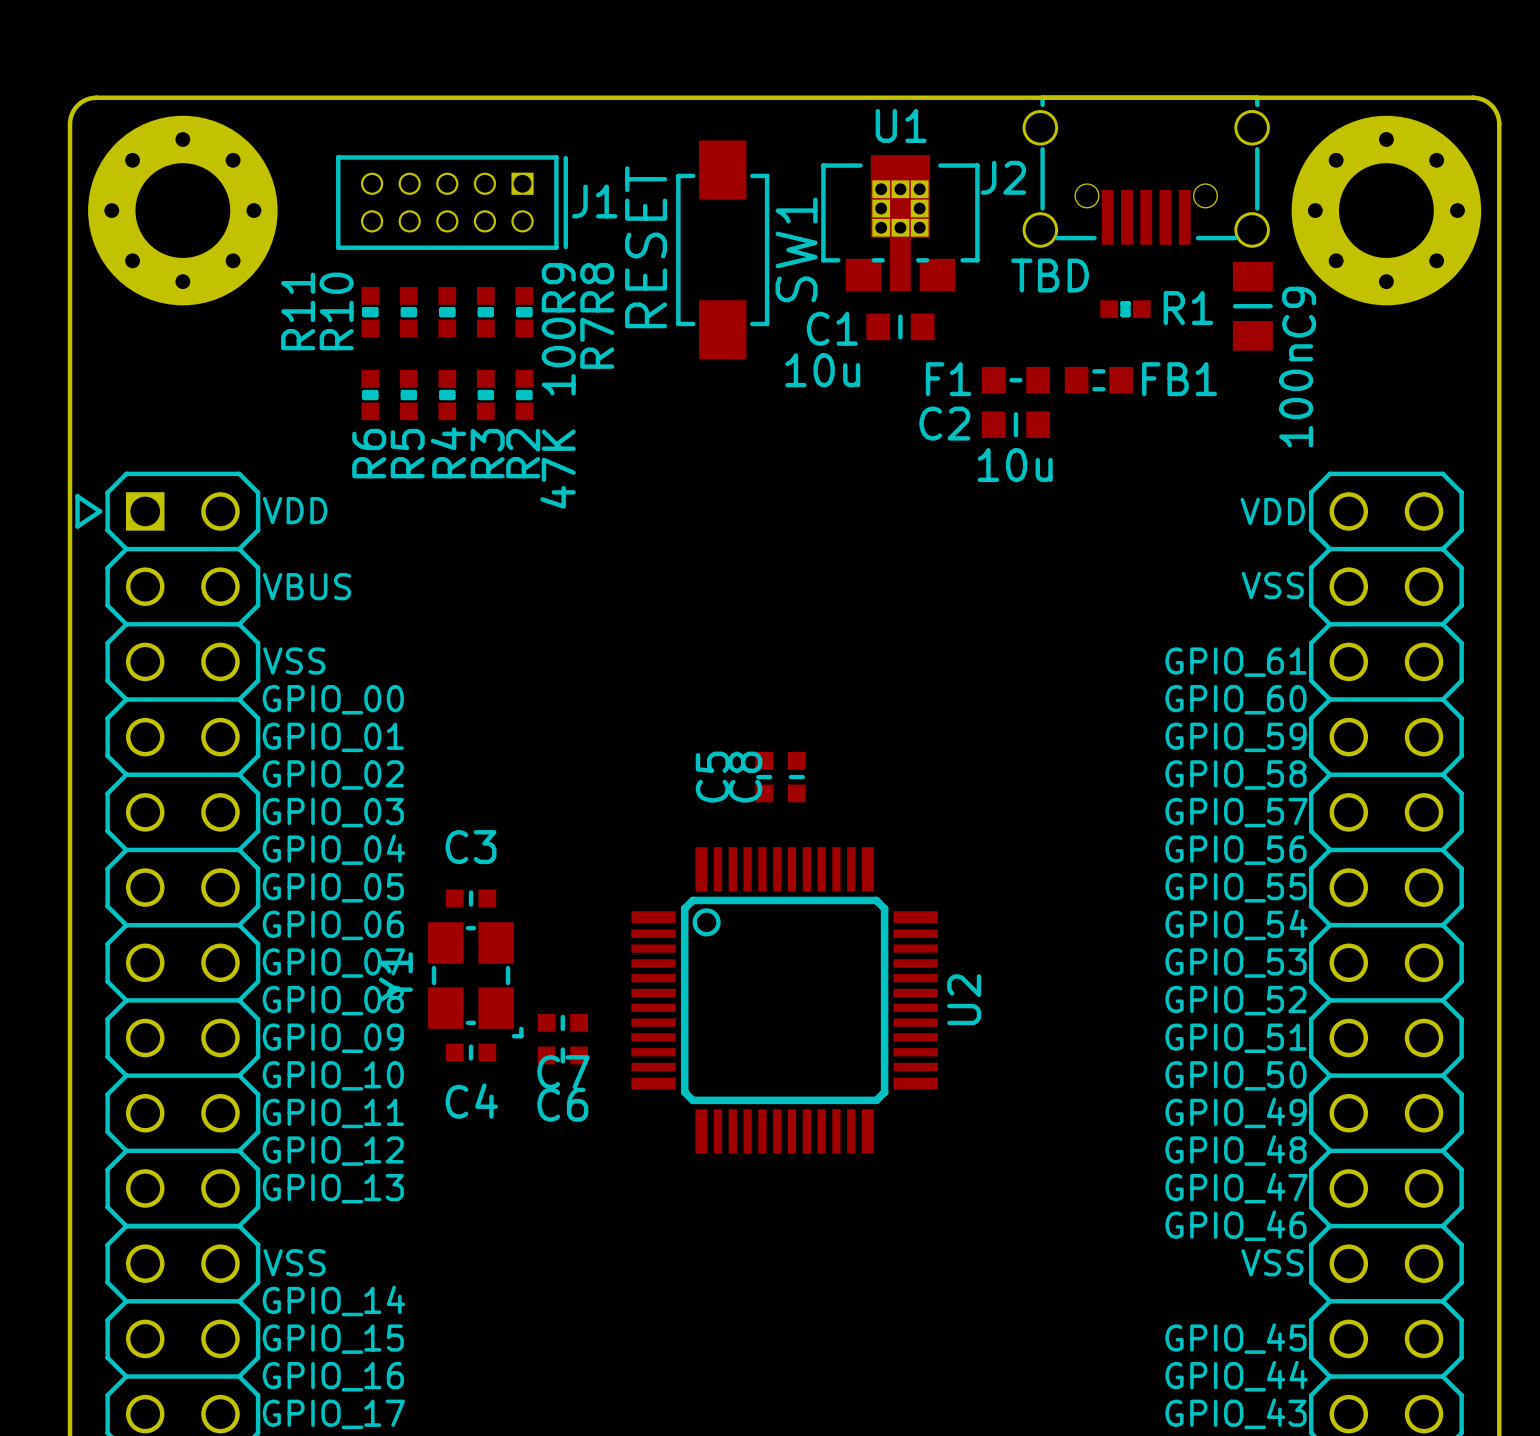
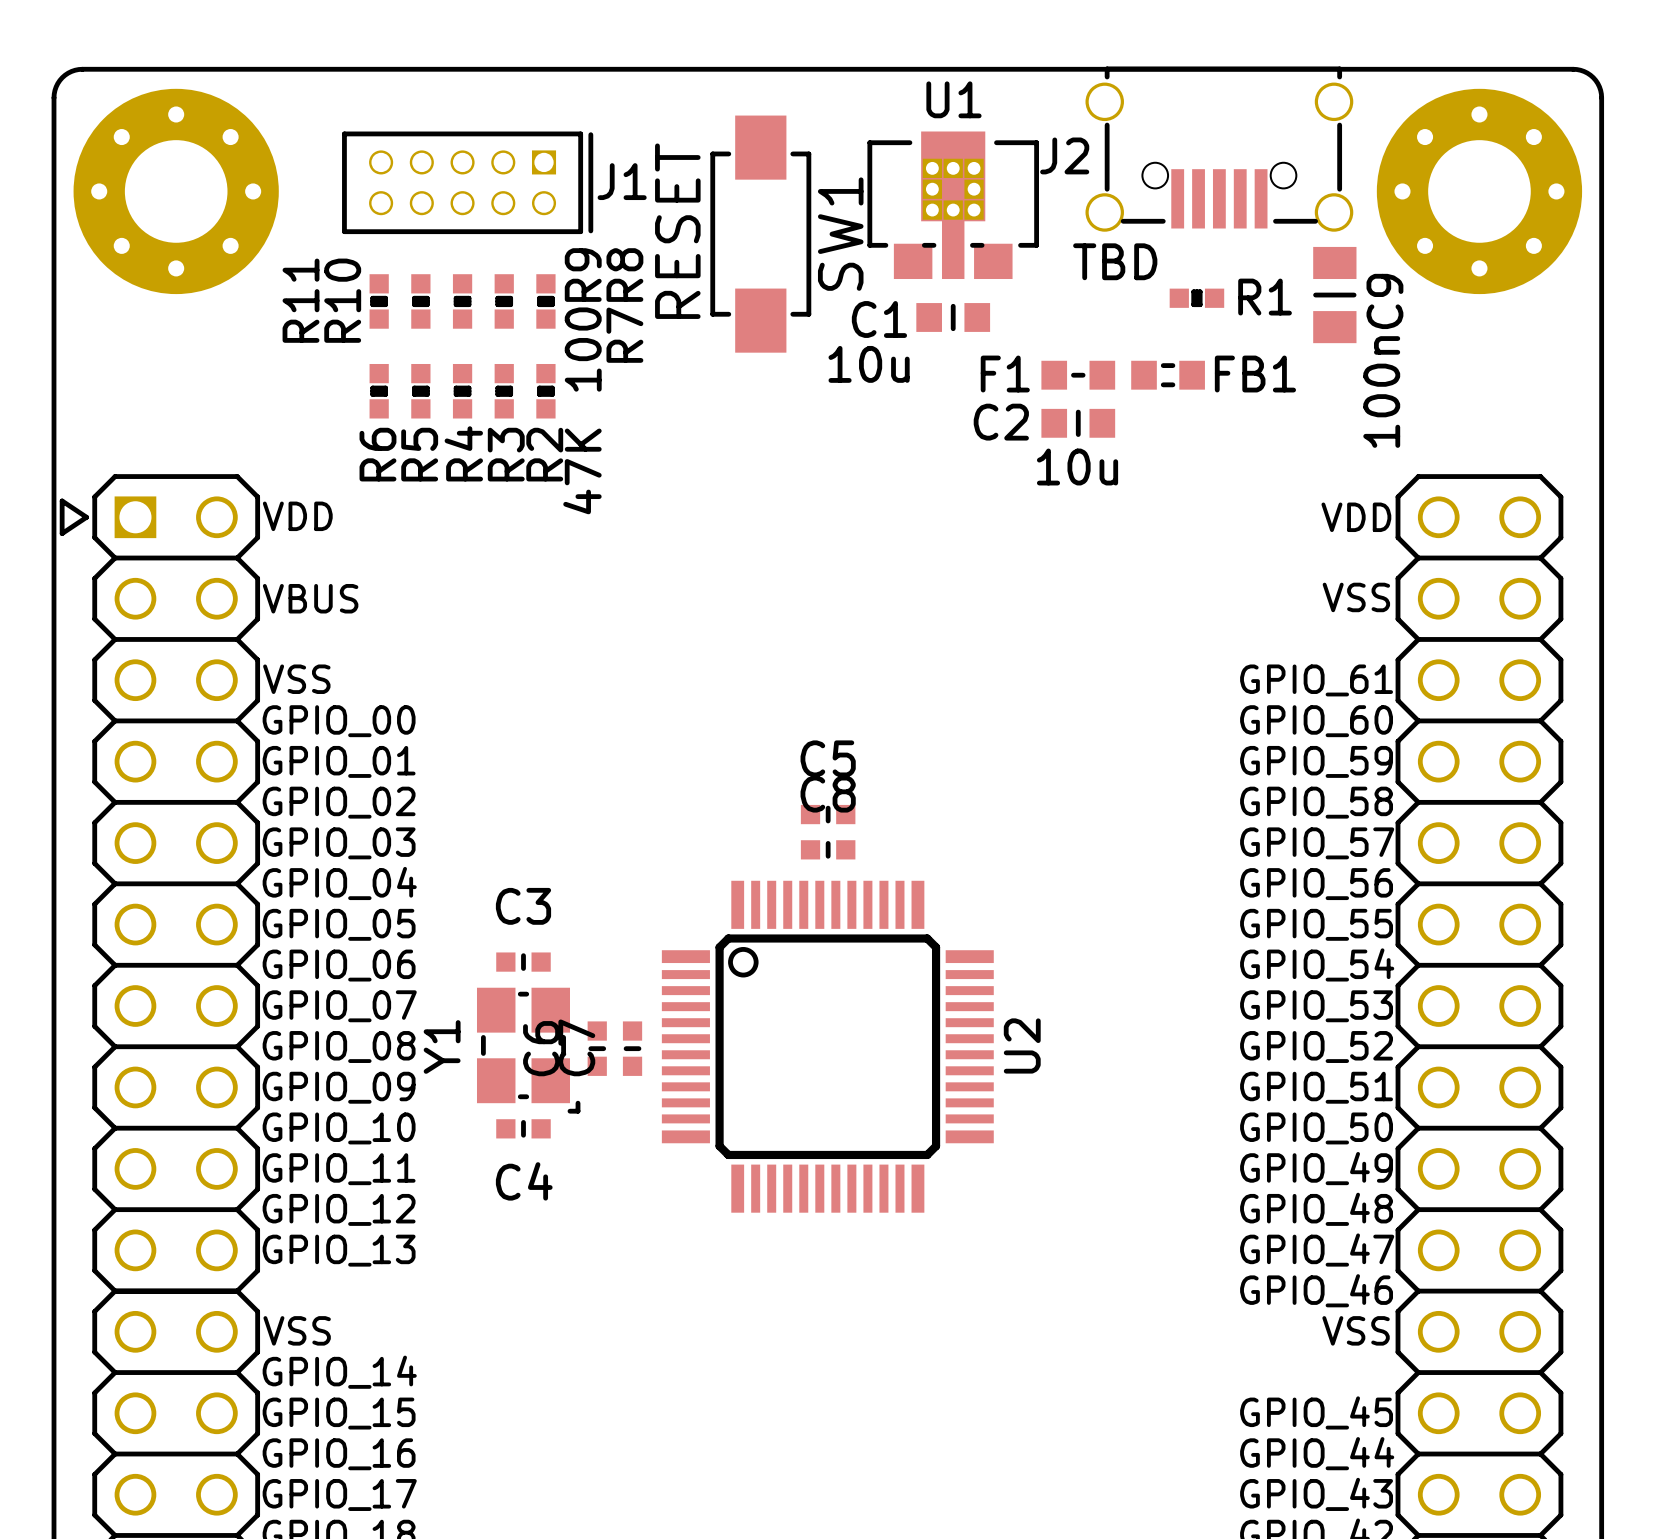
C5 rotation: 0° (764, 777) -> 90° clockwise (828, 814)
C8 rotation: 0° (796, 777) -> 90° clockwise (828, 849)
C8 position: (796, 777) -> (828, 849)
C3 position: (471, 898) -> (523, 962)
Y1 position: (475, 980) -> (528, 1050)
C7 rotation: 0° (562, 1022) -> 90° clockwise (632, 1048)
C7 position: (562, 1022) -> (632, 1048)
C4 position: (471, 1052) -> (523, 1128)
C6 rotation: 0° (562, 1055) -> 90° clockwise (597, 1048)
C6 position: (562, 1055) -> (597, 1048)

